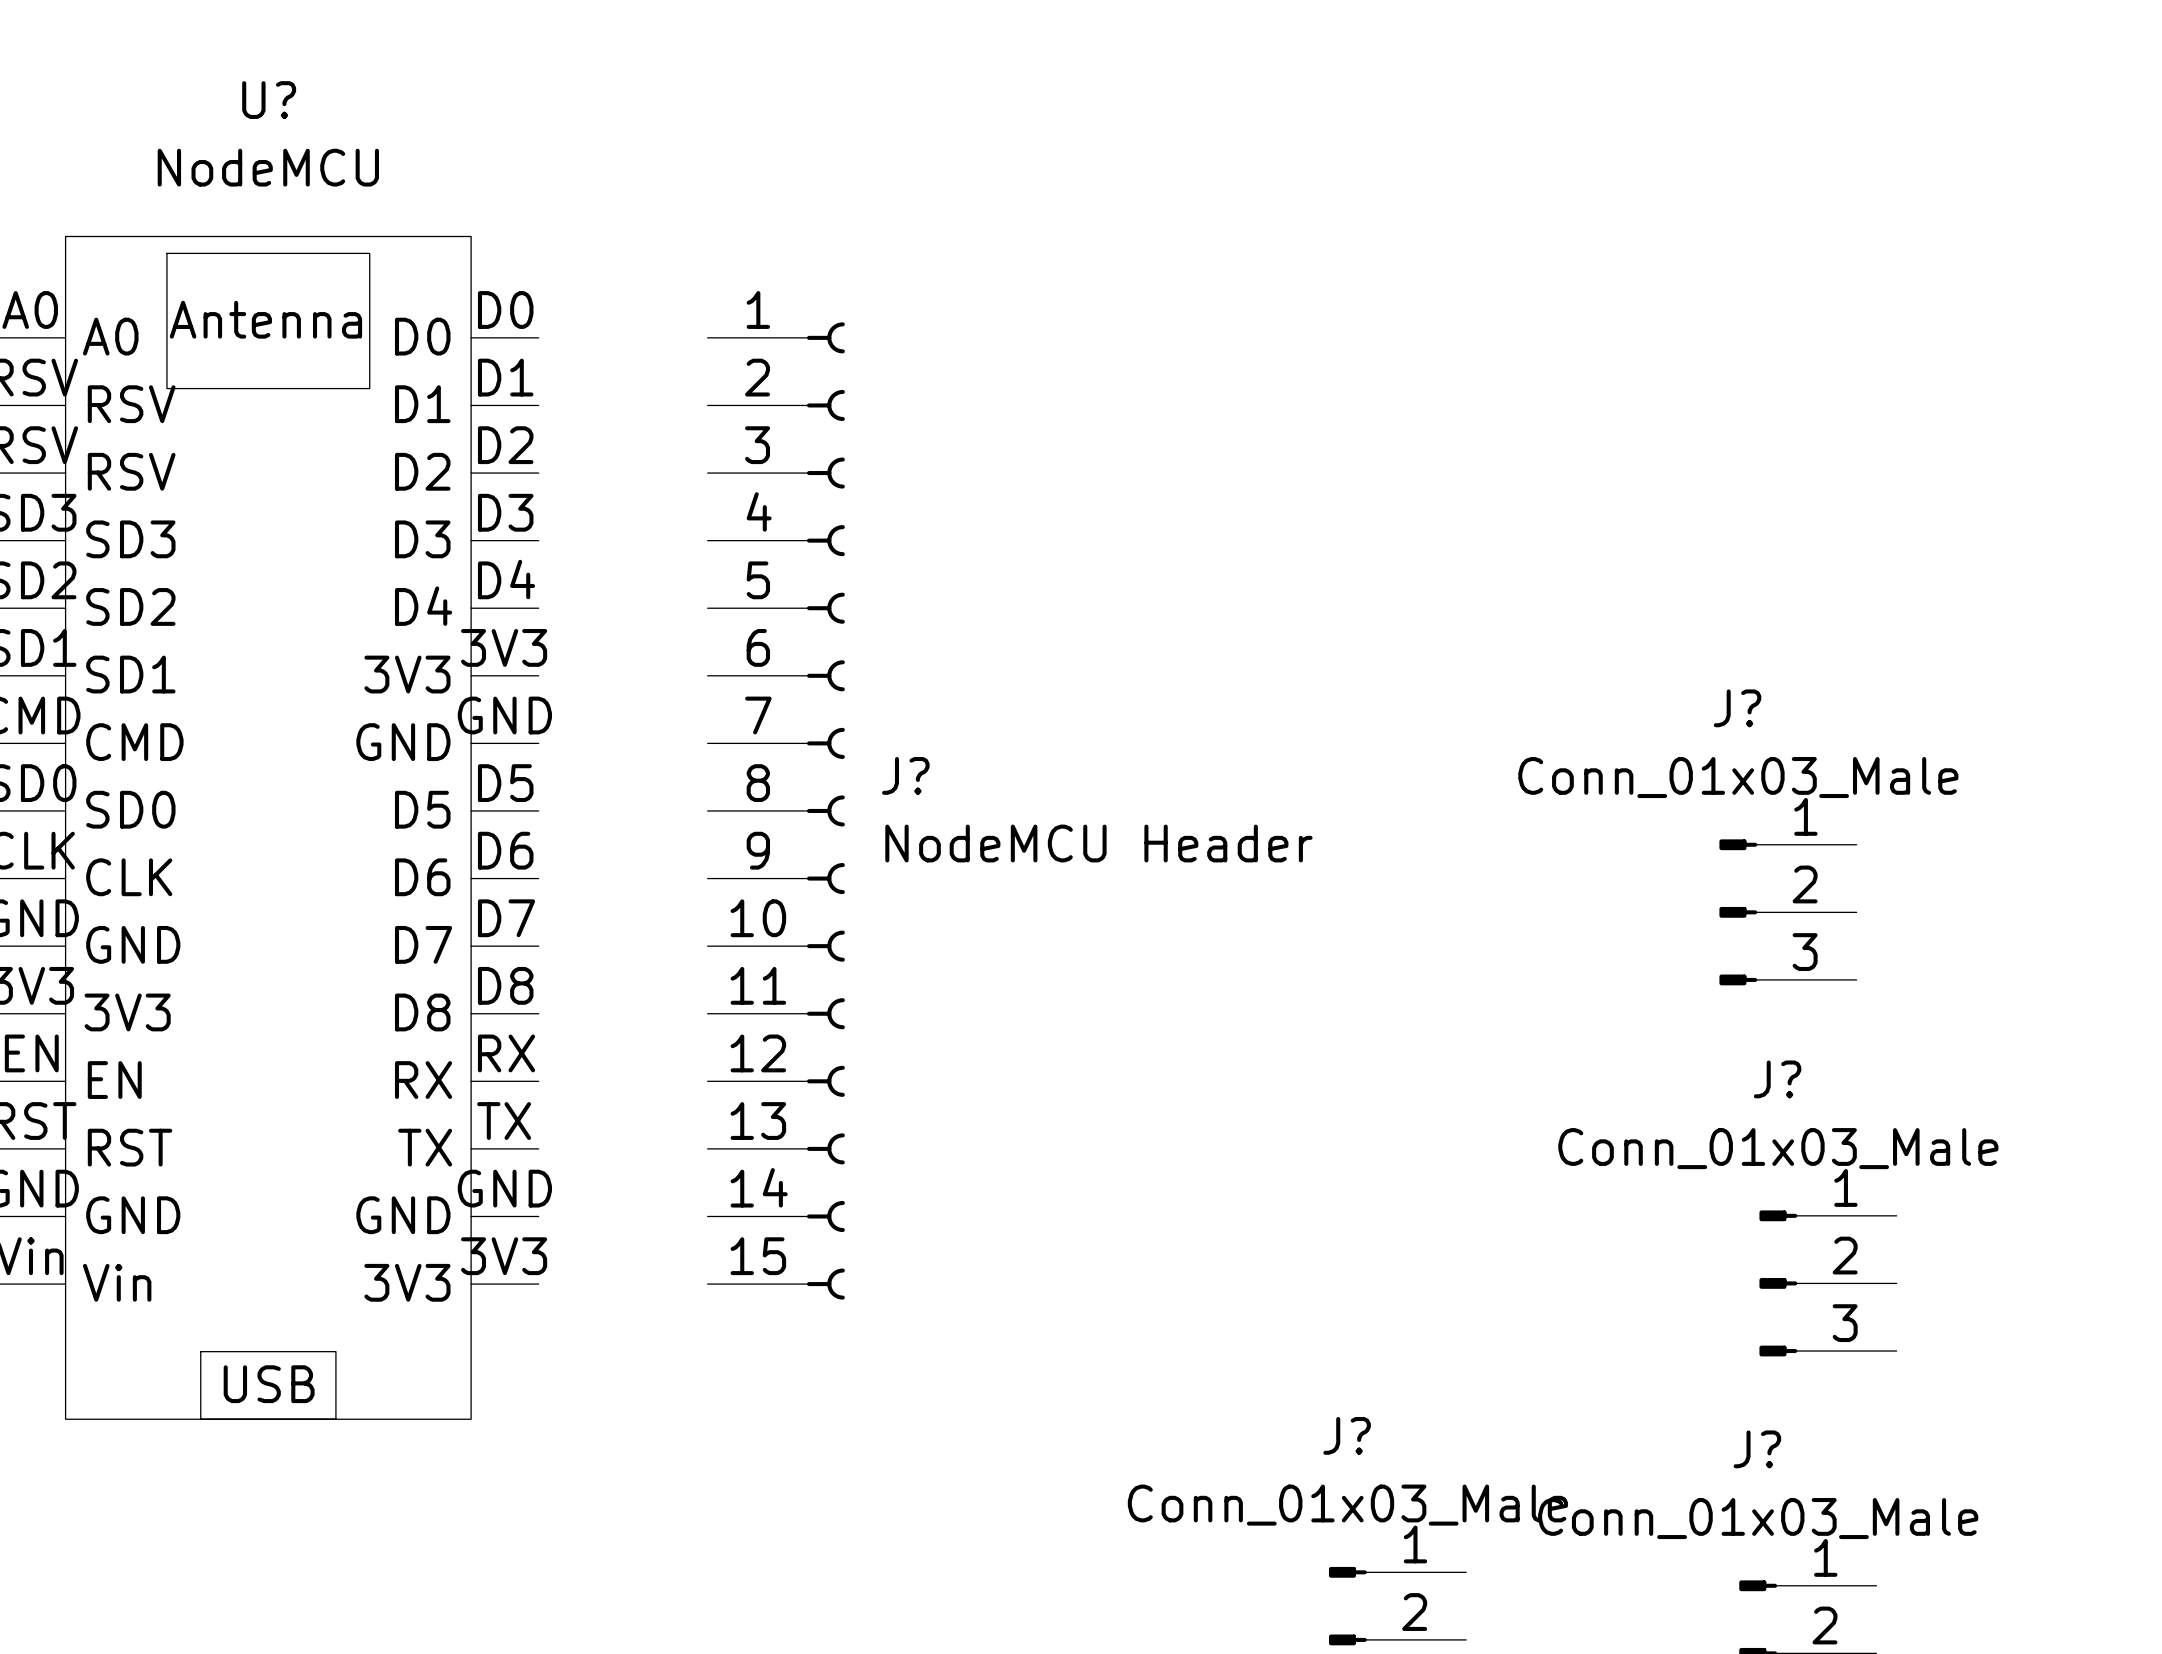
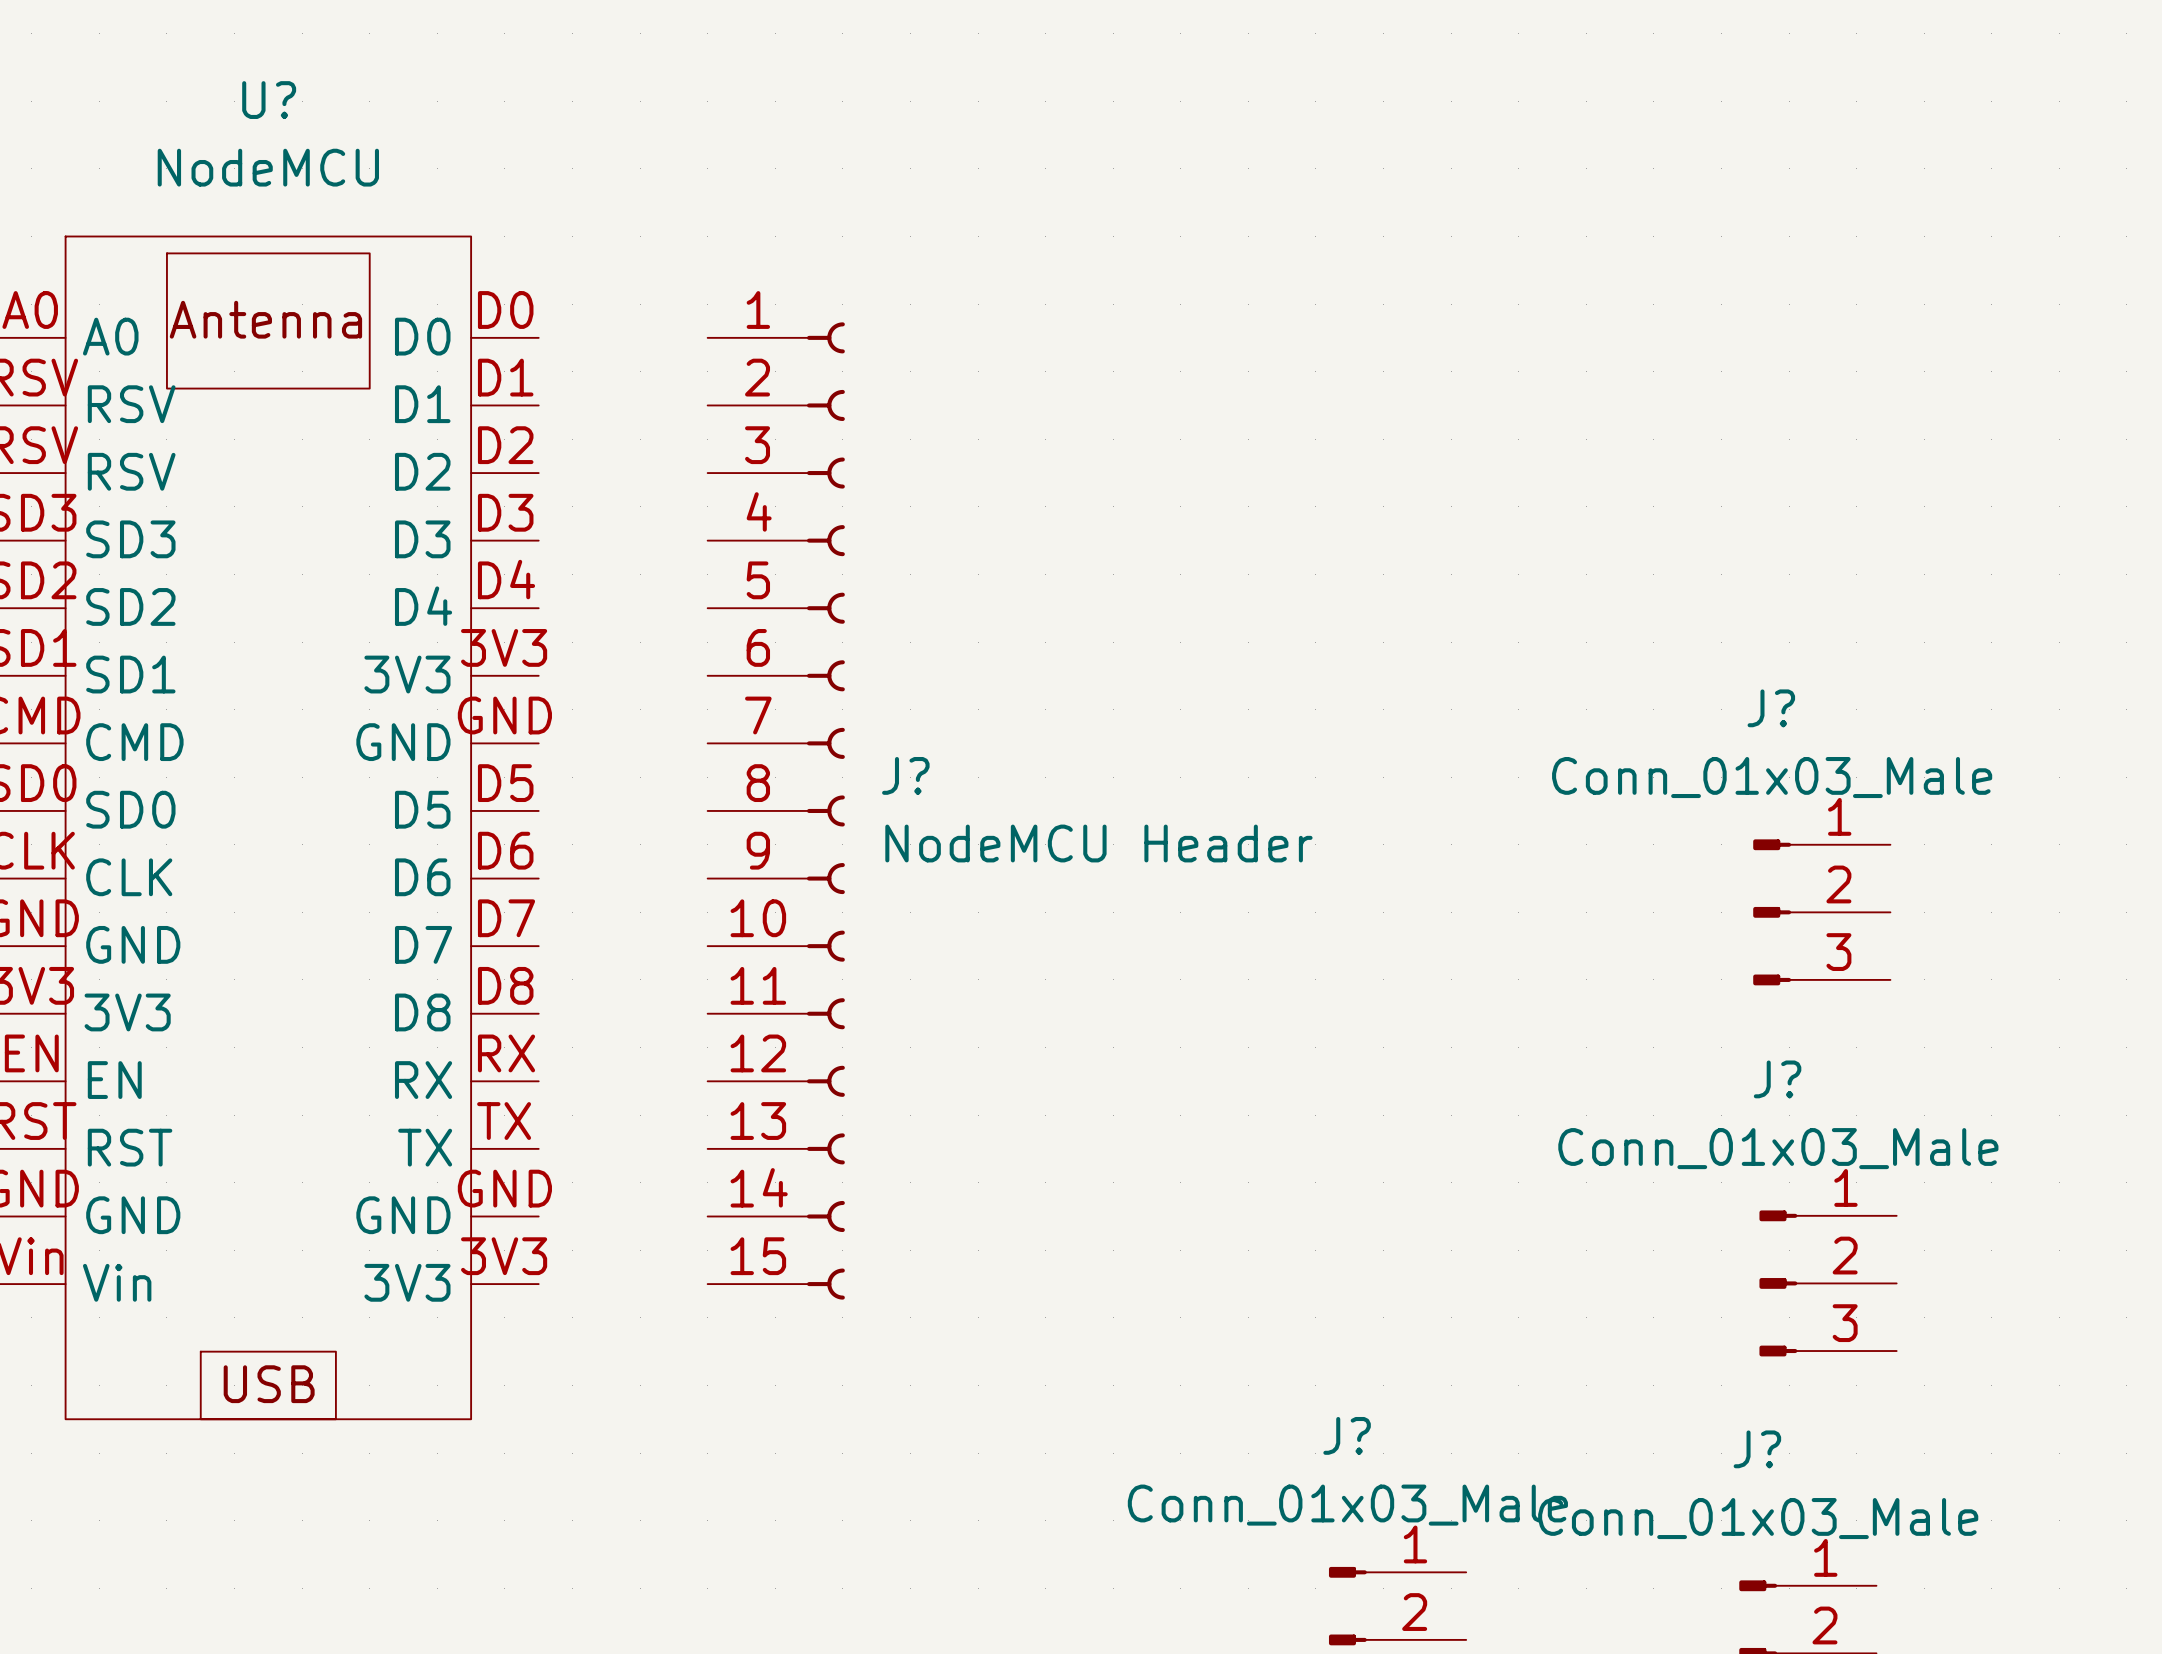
J? position: (1788, 912) -> (1821, 912)

